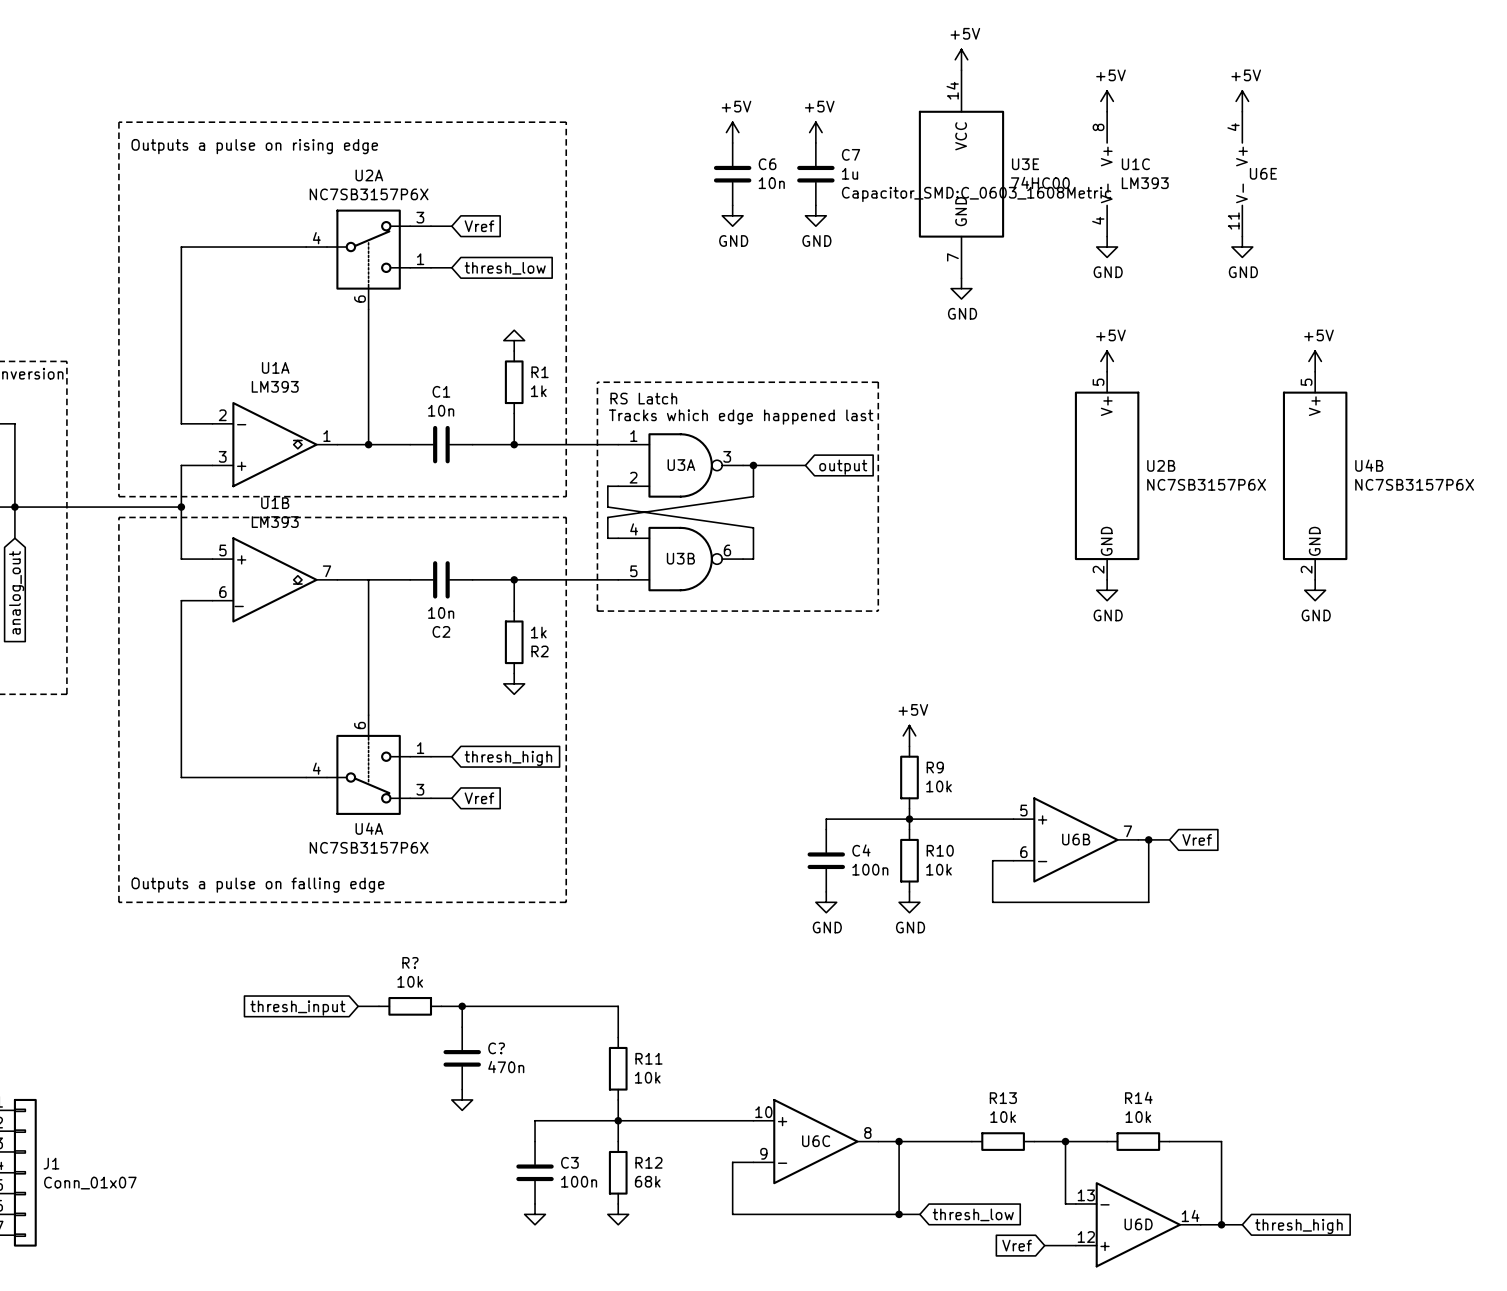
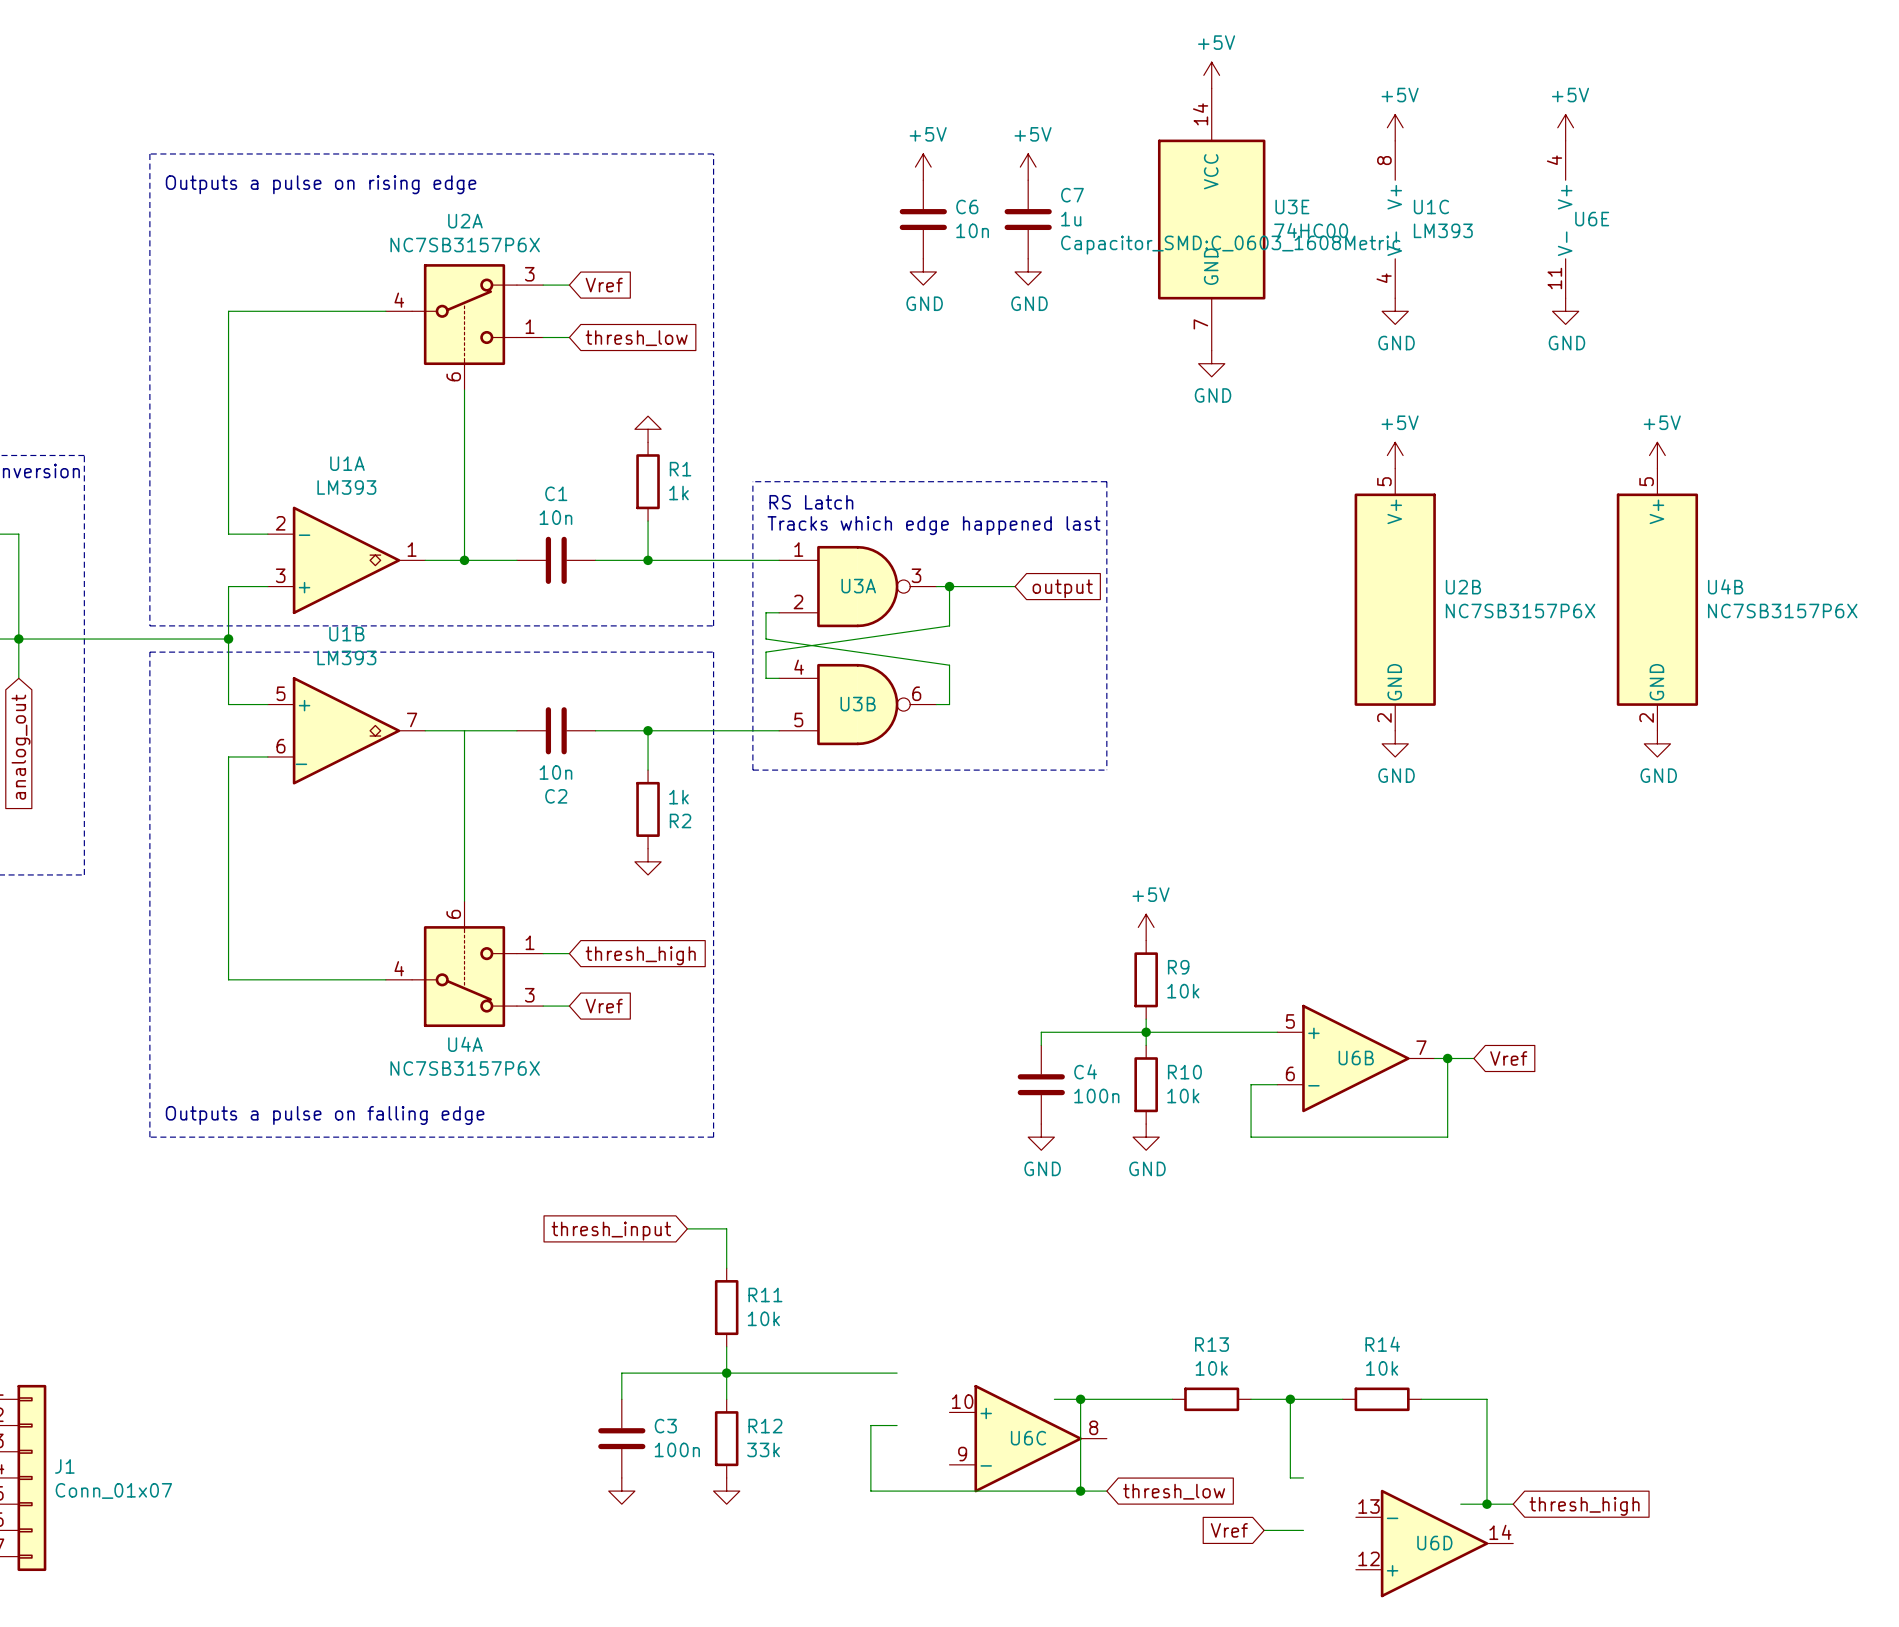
wire: none -> (687, 1228) (726, 1228) (726, 1268)
wire: (358, 1006) (378, 1006) -> none
R?: 10k (410, 1006) -> none
wire: (441, 1006) (618, 1006) (618, 1037) -> none
wire: (462, 1006) (462, 1027) -> none
junction: (462, 1006) -> none
global label position: thresh_input (297, 1008) -> thresh_input (611, 1231)
C?: 470n (462, 1058) -> none
R11 position: (618, 1068) -> (726, 1307)
junction: none -> (726, 1373)
power symbol: (462, 1099) -> none
wire: (618, 1099) (618, 1141) -> (726, 1346) (726, 1399)
junction: none -> (1080, 1399)
junction: none -> (1290, 1399)
junction: (618, 1120) -> none
wire: (753, 1120) (535, 1120) (535, 1141) -> (897, 1373) (621, 1373) (621, 1399)
wire: (878, 1141) (971, 1141) -> (1054, 1399) (1172, 1399)
wire: (899, 1141) (899, 1214) -> (1080, 1399) (1080, 1491)
junction: (899, 1141) -> none
R13 position: (1003, 1141) -> (1211, 1399)
wire: (1034, 1141) (1107, 1141) -> (1251, 1399) (1342, 1399)
wire: (1065, 1141) (1065, 1203) (1075, 1203) -> (1290, 1399) (1290, 1477) (1303, 1477)
junction: (1065, 1141) -> none
R14 position: (1138, 1141) -> (1382, 1399)
wire: (1169, 1141) (1221, 1141) (1221, 1224) -> (1421, 1399) (1486, 1399) (1486, 1504)
wire: (753, 1162) (732, 1162) (732, 1214) (919, 1214) -> (897, 1425) (870, 1425) (870, 1491) (1106, 1491)
C3 position: (535, 1172) -> (621, 1438)
R12 position: (618, 1172) -> (726, 1438)
R12 value: 68k (647, 1181) -> 33k (763, 1449)
power symbol: none -> (621, 1491)
power symbol: none -> (726, 1491)
junction: none -> (1080, 1491)
junction: none -> (1486, 1504)
power symbol: (535, 1214) -> none
power symbol: (618, 1214) -> none
junction: (899, 1214) -> none
global label position: thresh_low (973, 1214) -> thresh_low (1174, 1491)
wire: (1200, 1224) (1242, 1224) -> (1460, 1504) (1513, 1504)
junction: (1221, 1224) -> none
global label position: thresh_high (1298, 1226) -> thresh_high (1584, 1506)
global label position: Vref (1017, 1245) -> Vref (1229, 1530)
wire: (1044, 1245) (1075, 1245) -> (1264, 1530) (1303, 1530)

